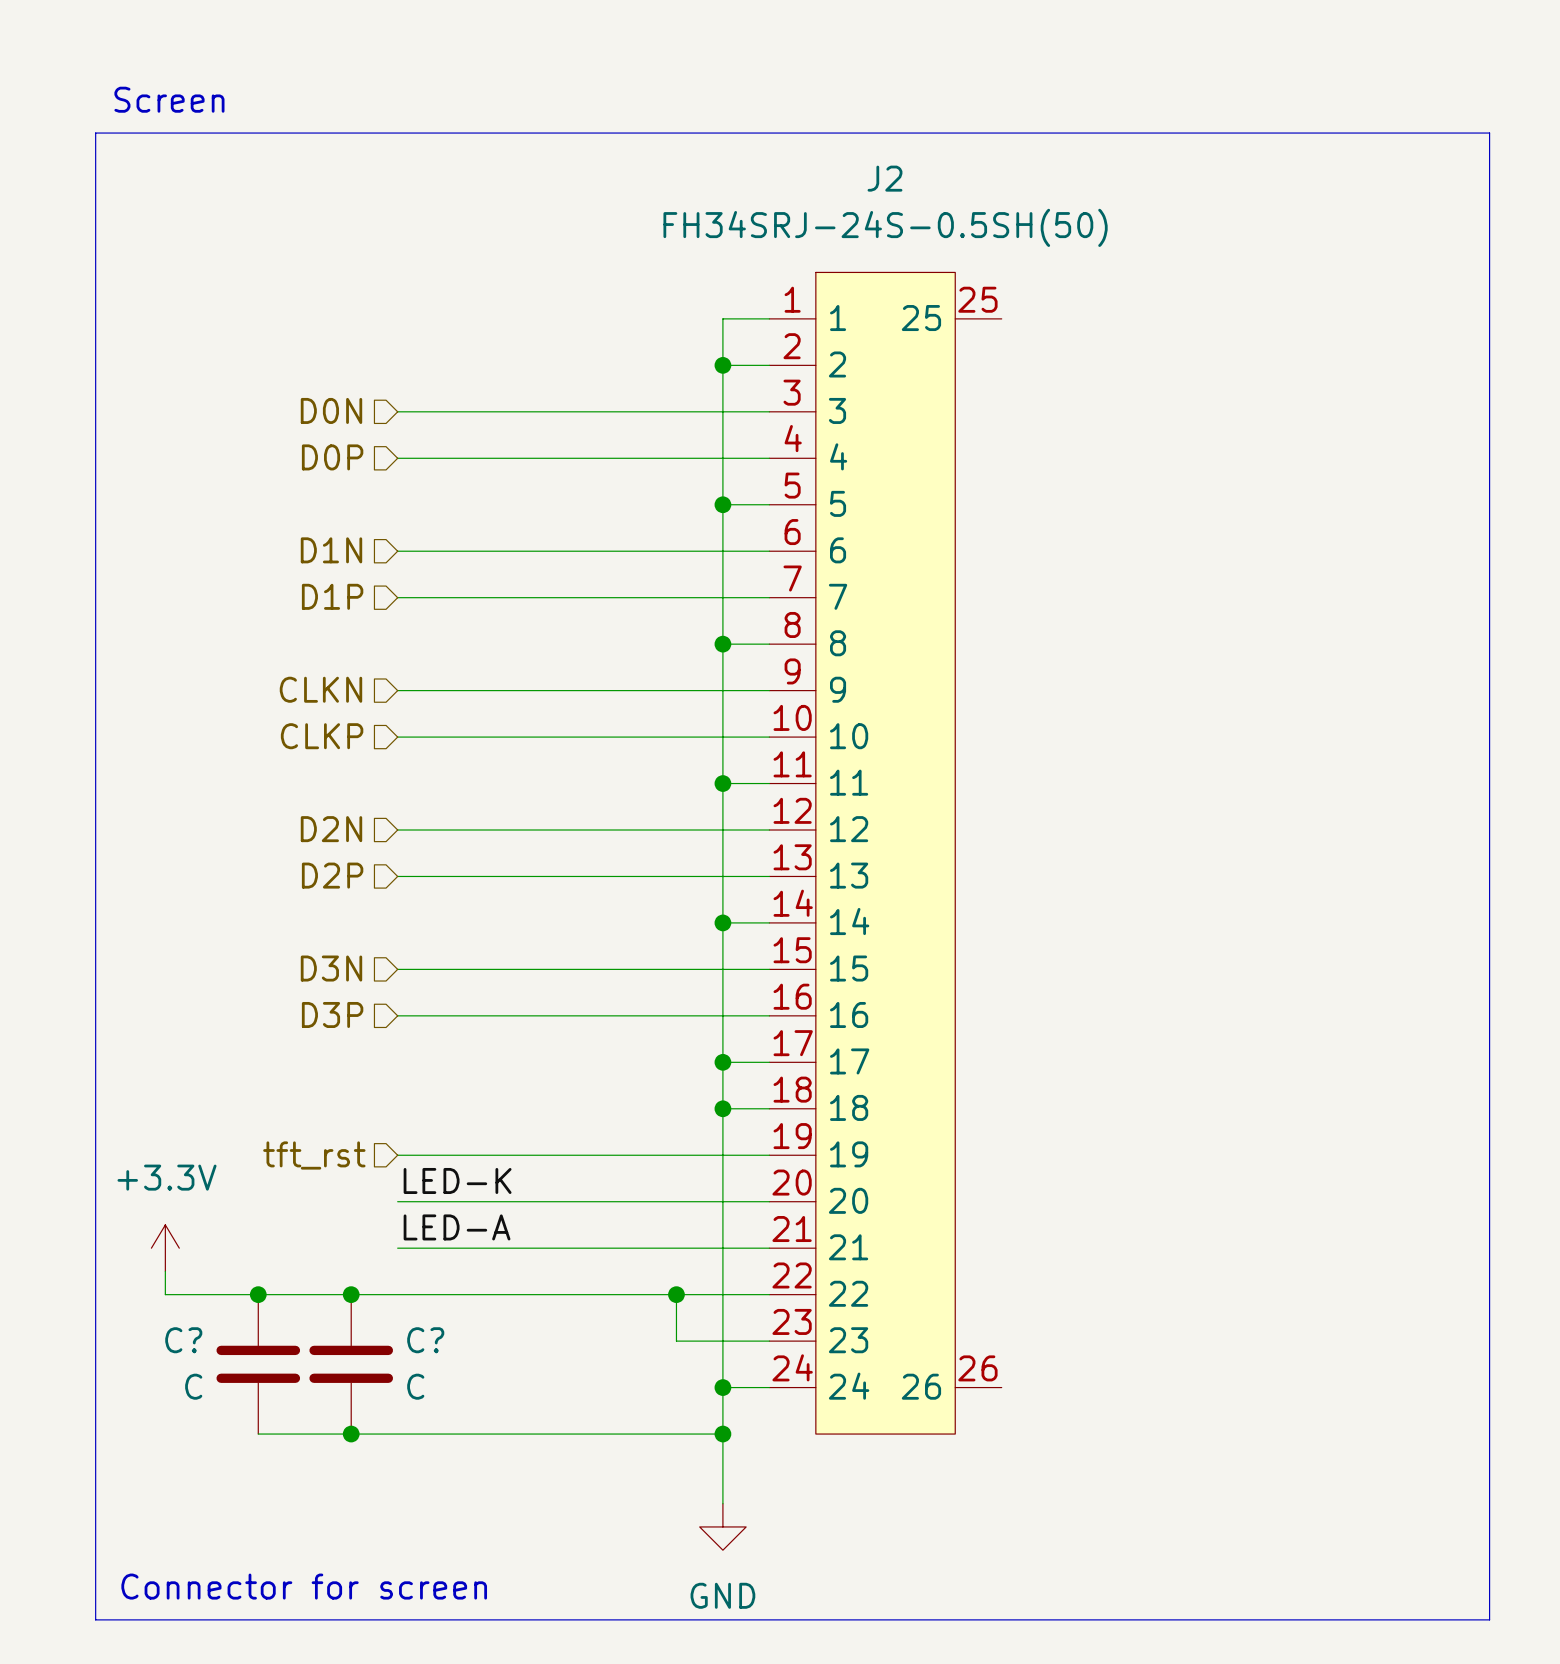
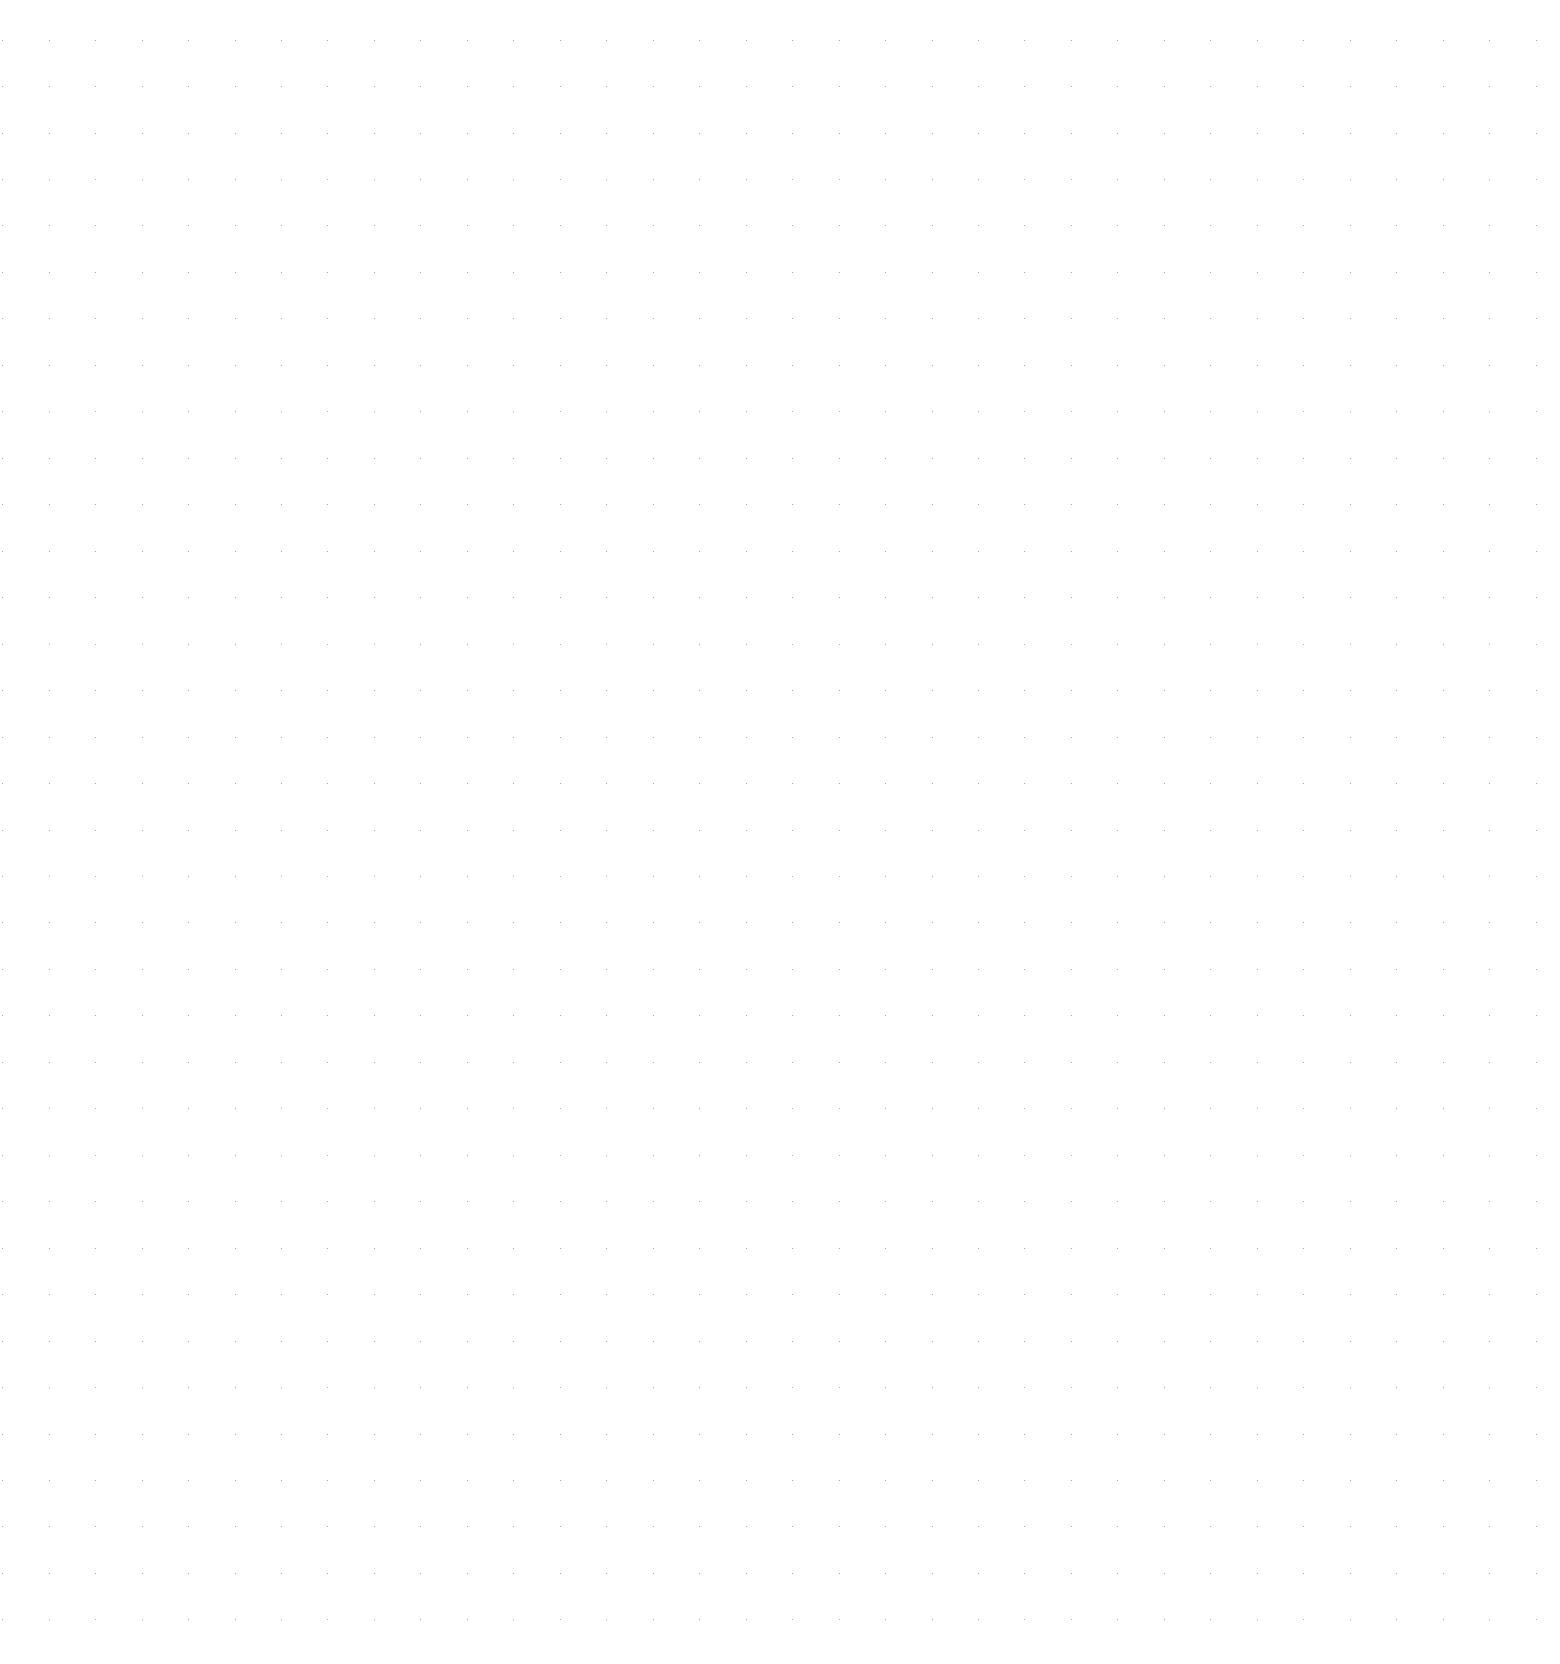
text: Screen (169, 99) -> none
line: (95, 133) (1489, 133) (1489, 1619) (95, 1619) (95, 133) -> none
wire: (769, 318) (722, 318) (722, 1503) -> none
wire: (722, 365) (769, 365) -> none
junction: (722, 365) -> none
hierarchical label: D0N (331, 410) -> none
wire: (397, 411) (769, 411) -> none
hierarchical label: D0P (332, 457) -> none
wire: (397, 458) (769, 458) -> none
wire: (722, 504) (769, 504) -> none
junction: (722, 504) -> none
hierarchical label: D1N (331, 550) -> none
wire: (397, 551) (769, 551) -> none
hierarchical label: D1P (332, 596) -> none
wire: (397, 597) (769, 597) -> none
wire: (722, 644) (769, 644) -> none
junction: (722, 644) -> none
hierarchical label: CLKN (320, 689) -> none
wire: (397, 690) (769, 690) -> none
hierarchical label: CLKP (322, 736) -> none
wire: (397, 737) (769, 737) -> none
wire: (722, 783) (769, 783) -> none
junction: (722, 783) -> none
hierarchical label: D2N (331, 829) -> none
wire: (397, 830) (769, 830) -> none
J2: FH34SRJ-24S-0.5SH(50) (885, 853) -> none
hierarchical label: D2P (332, 875) -> none
wire: (397, 876) (769, 876) -> none
wire: (722, 922) (769, 922) -> none
junction: (722, 922) -> none
hierarchical label: D3N (331, 968) -> none
wire: (397, 969) (769, 969) -> none
hierarchical label: D3P (332, 1014) -> none
wire: (397, 1015) (769, 1015) -> none
wire: (722, 1062) (769, 1062) -> none
junction: (722, 1062) -> none
wire: (722, 1108) (769, 1108) -> none
junction: (722, 1108) -> none
hierarchical label: tft_rst (314, 1155) -> none
wire: (397, 1155) (769, 1155) -> none
label: LED-K (457, 1180) -> none
wire: (397, 1201) (769, 1201) -> none
label: LED-A (457, 1227) -> none
power symbol: +3.3V (165, 1248) -> none
wire: (397, 1248) (769, 1248) -> none
wire: (165, 1271) (165, 1294) (769, 1294) -> none
junction: (258, 1294) -> none
junction: (351, 1294) -> none
wire: (676, 1294) (676, 1341) (769, 1341) -> none
junction: (676, 1294) -> none
C?: C (258, 1364) -> none
C?: C (351, 1364) -> none
wire: (722, 1387) (769, 1387) -> none
junction: (722, 1387) -> none
wire: (258, 1434) (722, 1434) -> none
junction: (351, 1434) -> none
junction: (722, 1434) -> none
power symbol: GND (722, 1526) -> none
text: Connector for screen (304, 1586) -> none

